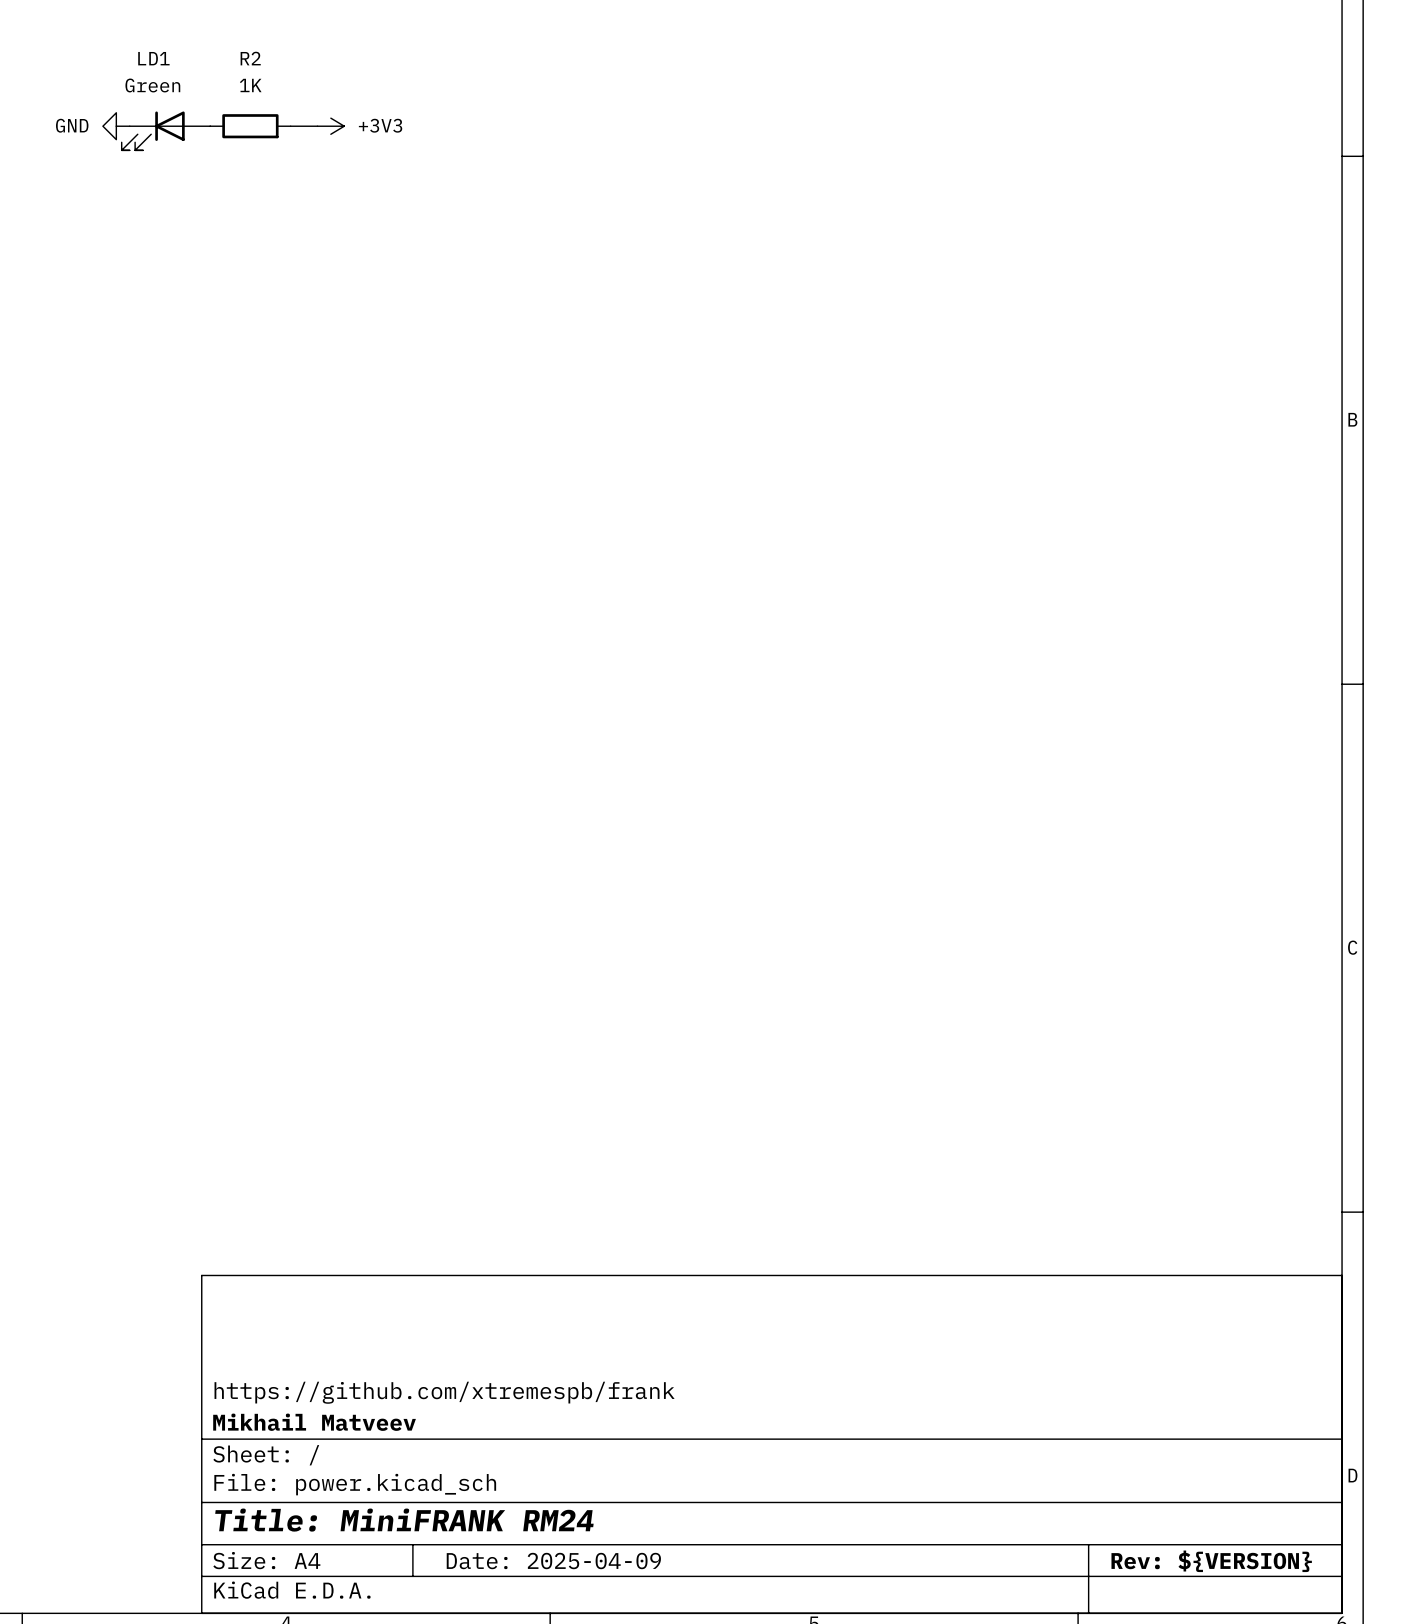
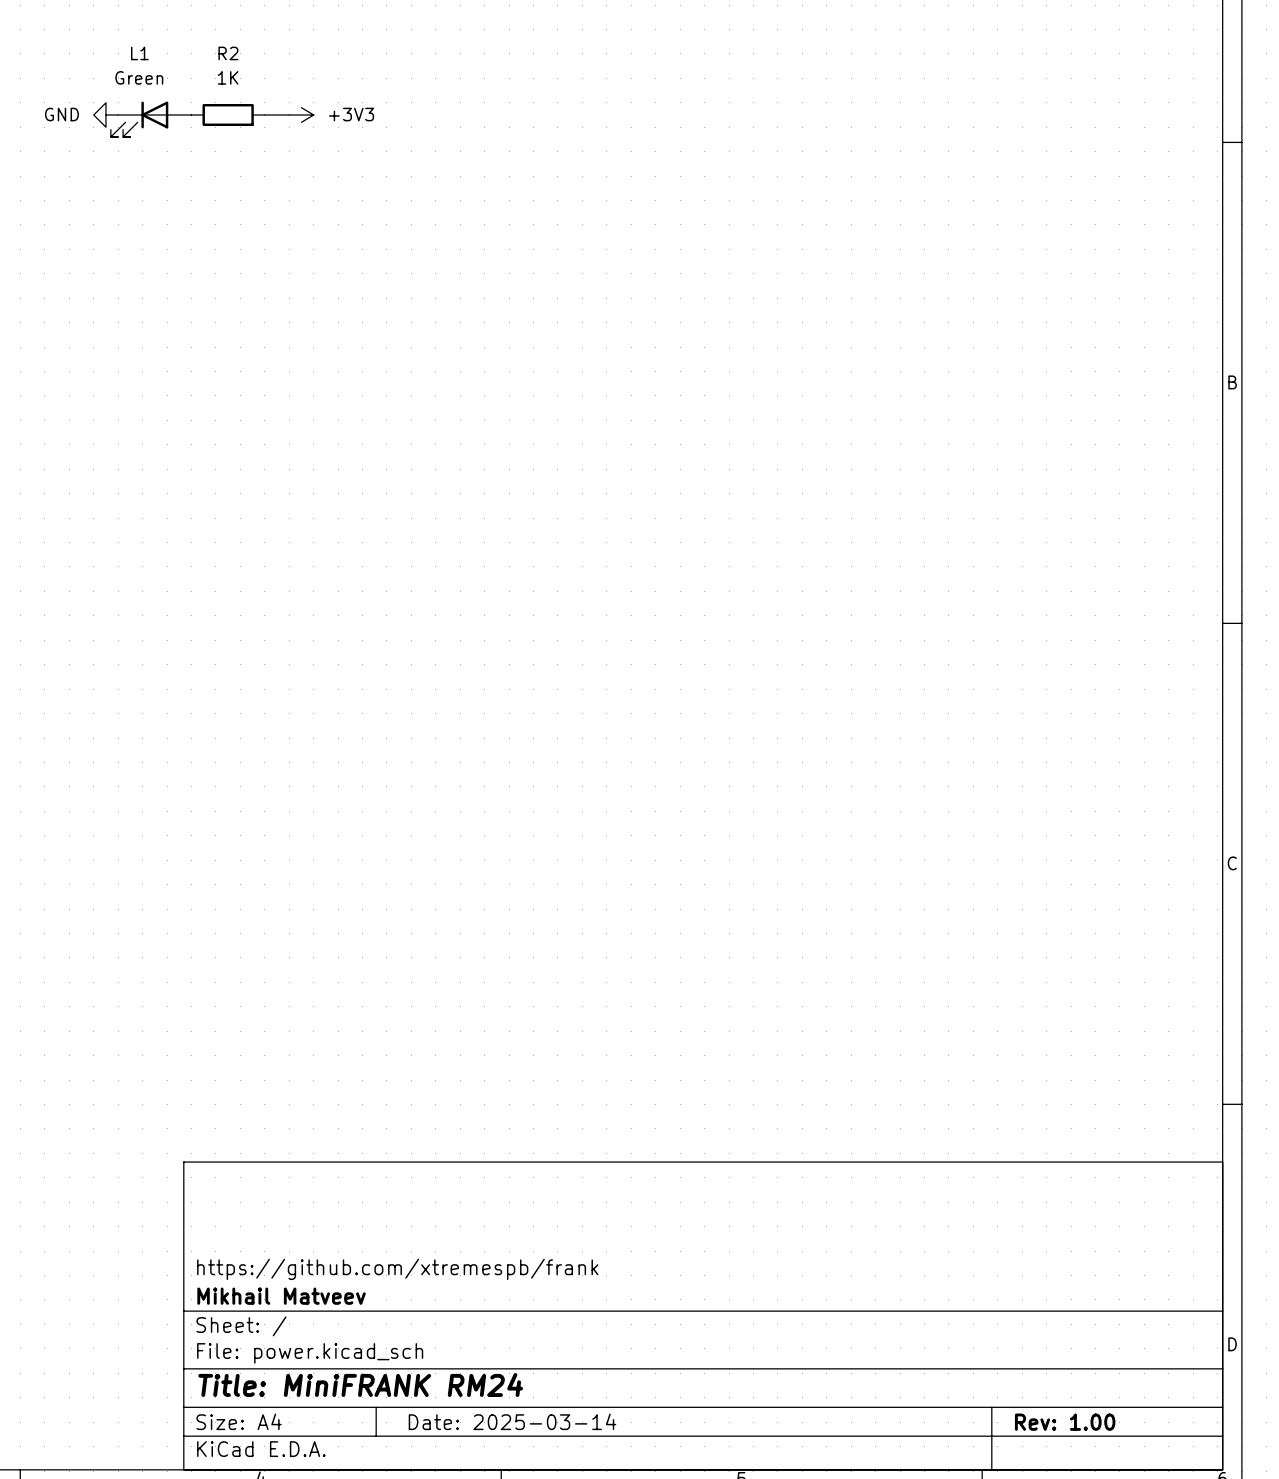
LD1 name: LD1 (153, 58) -> L1 (139, 53)
title block: Date: 2025-04-09 (553, 1561) -> Date: 2025-03-14 (512, 1421)
title block: Rev: ${VERSION} (1211, 1561) -> Rev: 1.00 (1065, 1422)

